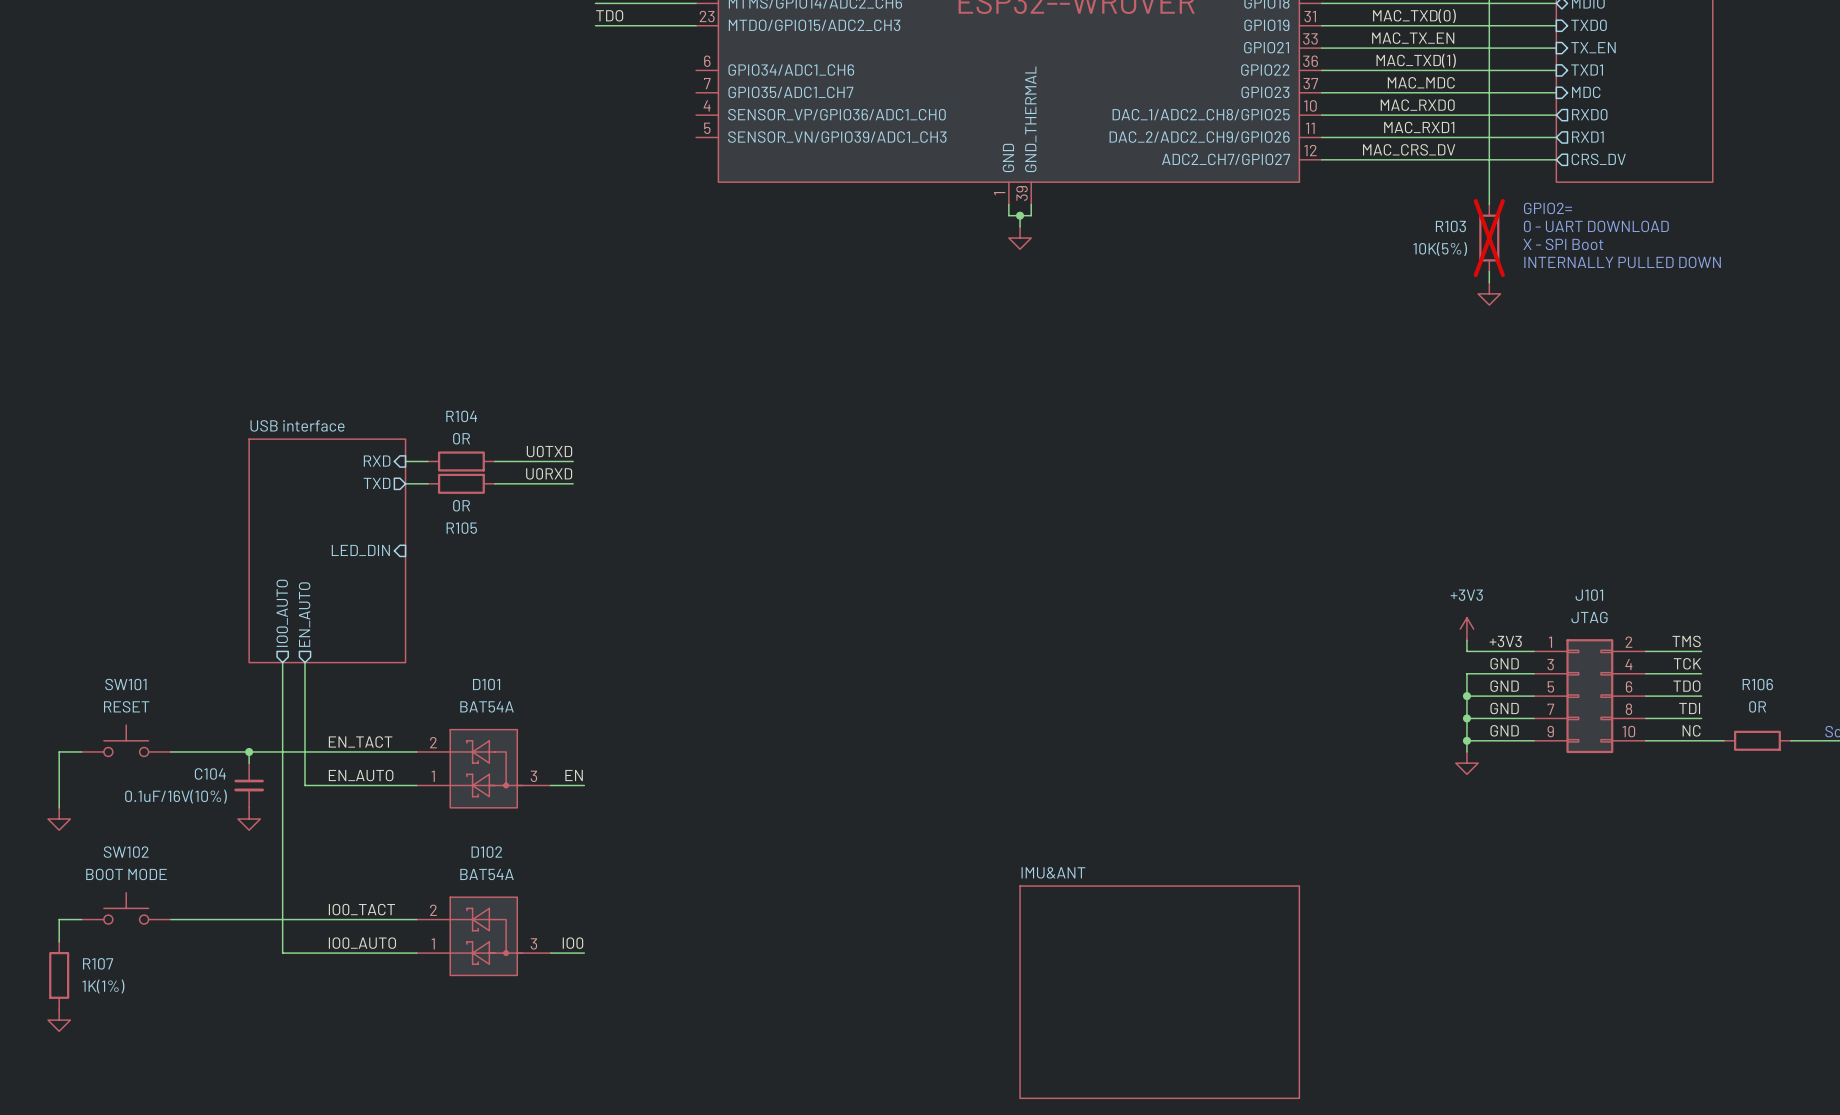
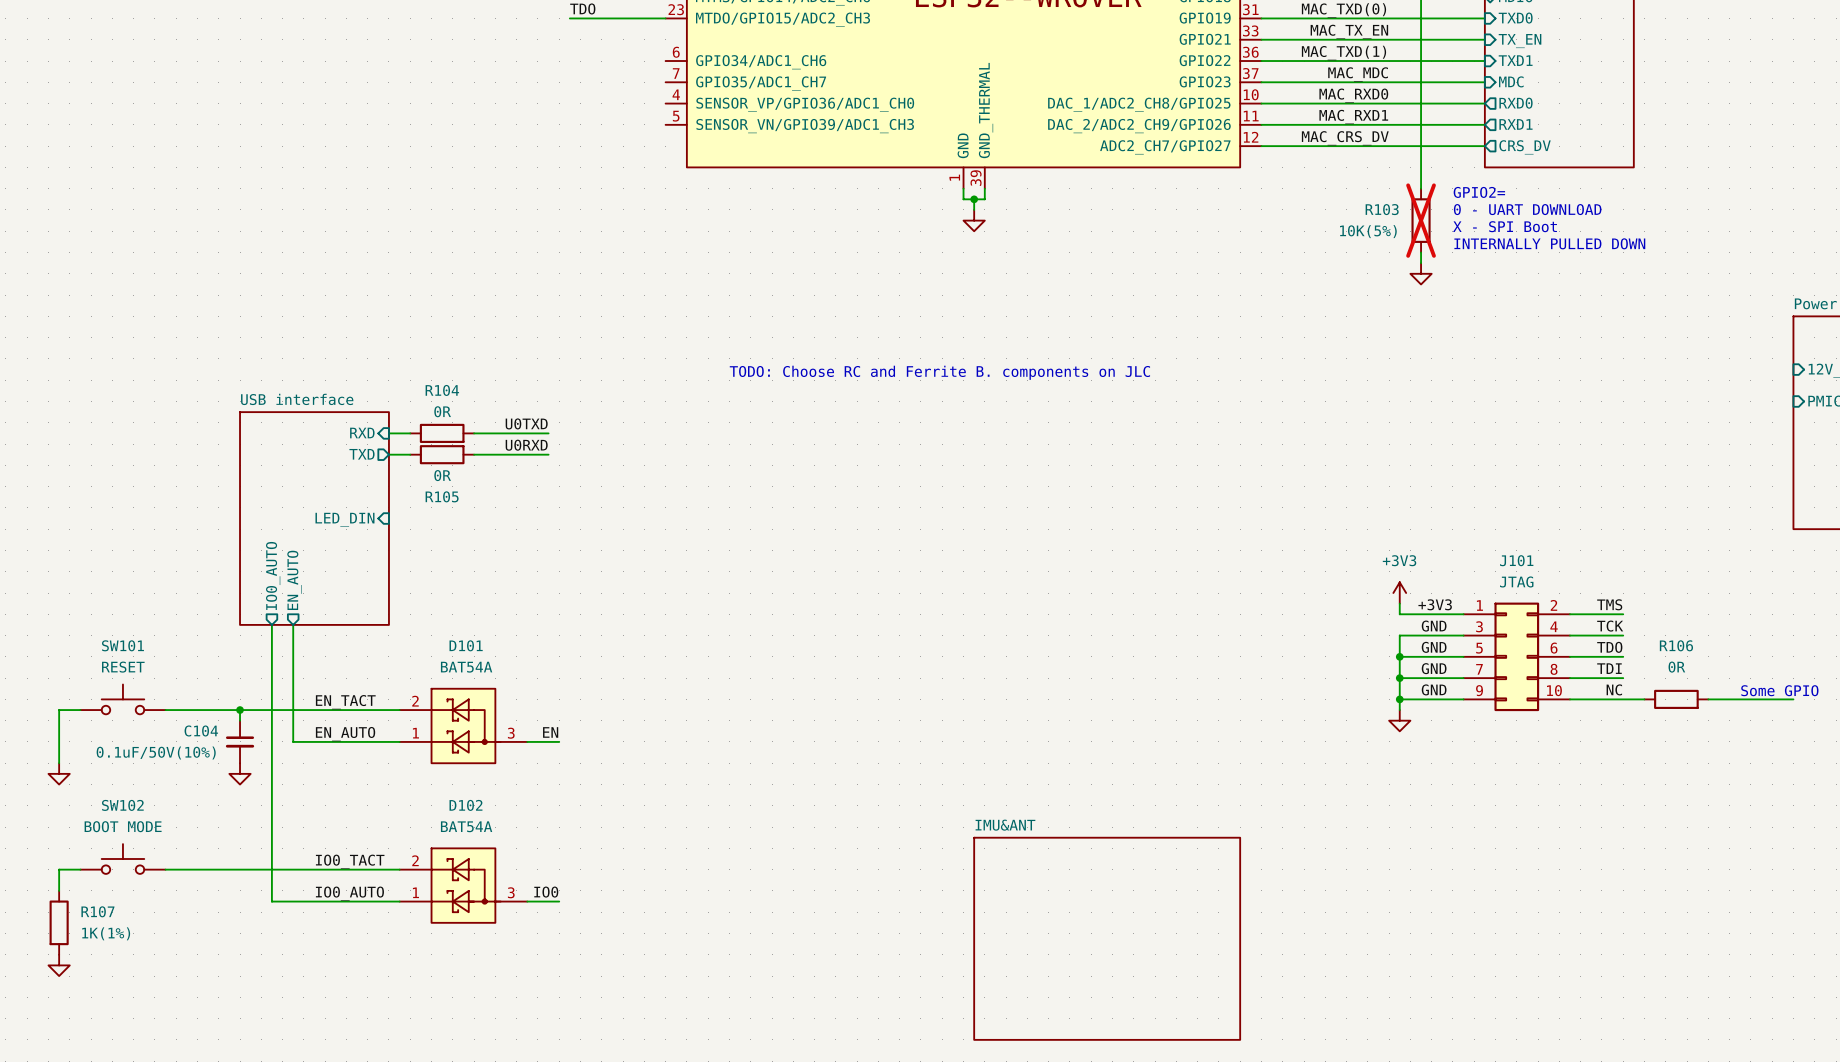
text: none -> TODO: Choose RC and Ferrite B. components on JLC (939, 372)
C104 value: 0.1uF/16V(10%) (176, 796) -> 0.1uF/50V(10%) (156, 753)

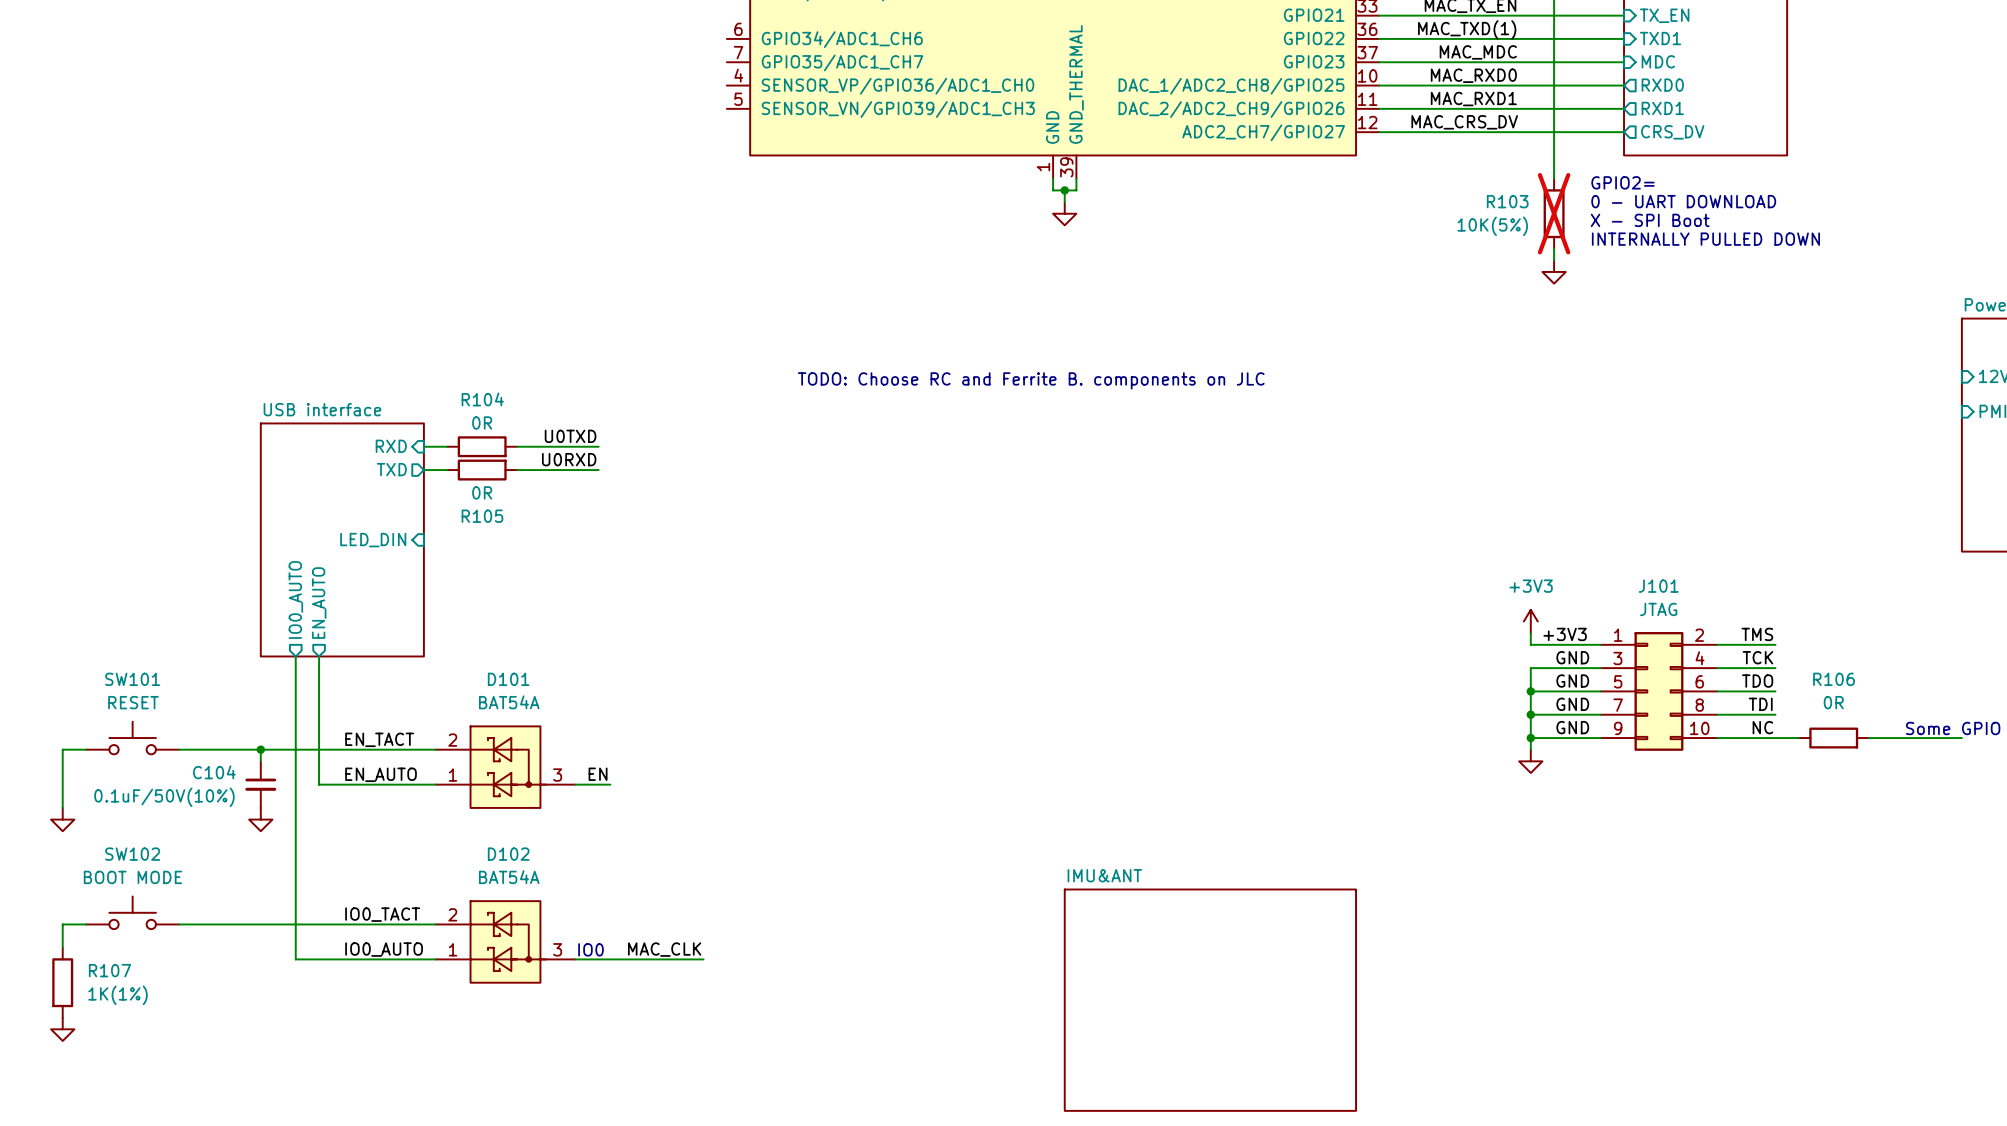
text: none -> IO0 (591, 949)
label: IO0 (546, 892) -> none
label: none -> MAC_CLK (664, 949)
wire: none -> (610, 959) (703, 959)

